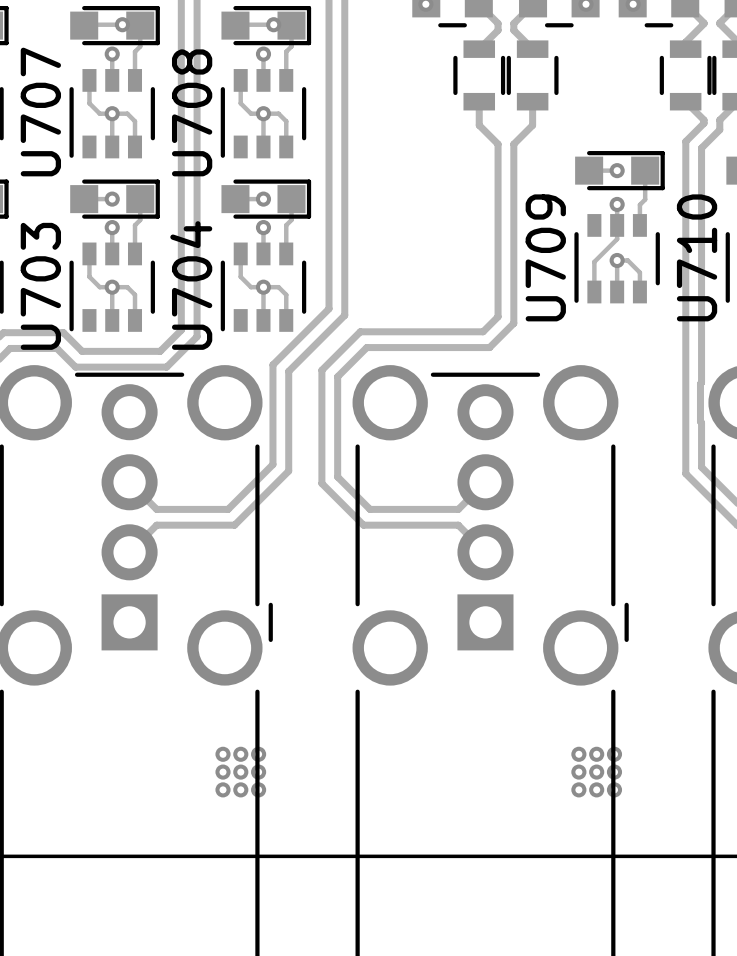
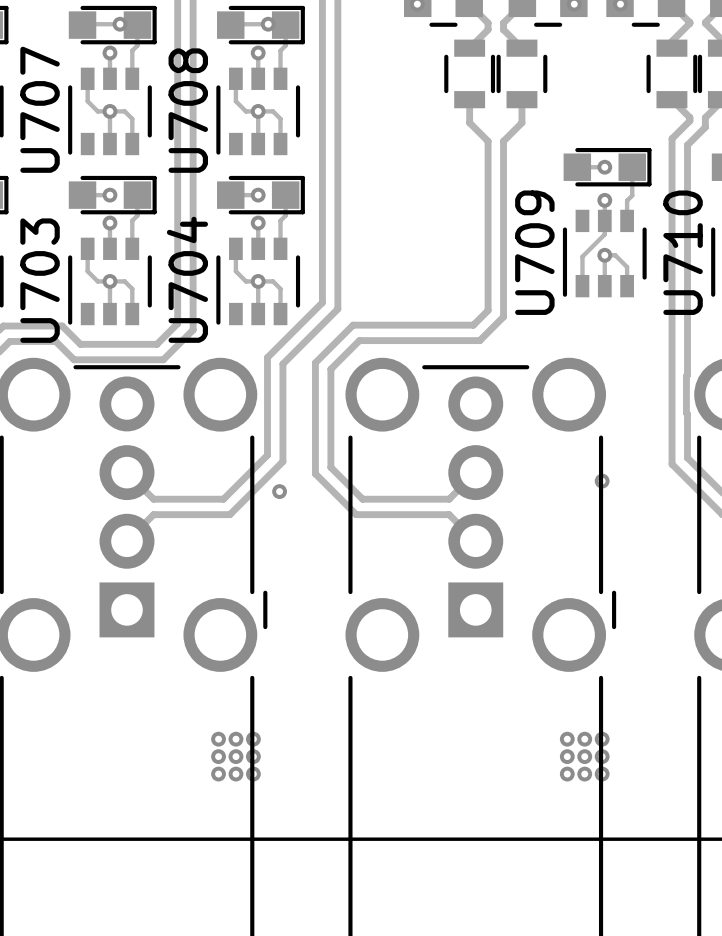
via: none -> (602, 481)
via: none -> (279, 491)

